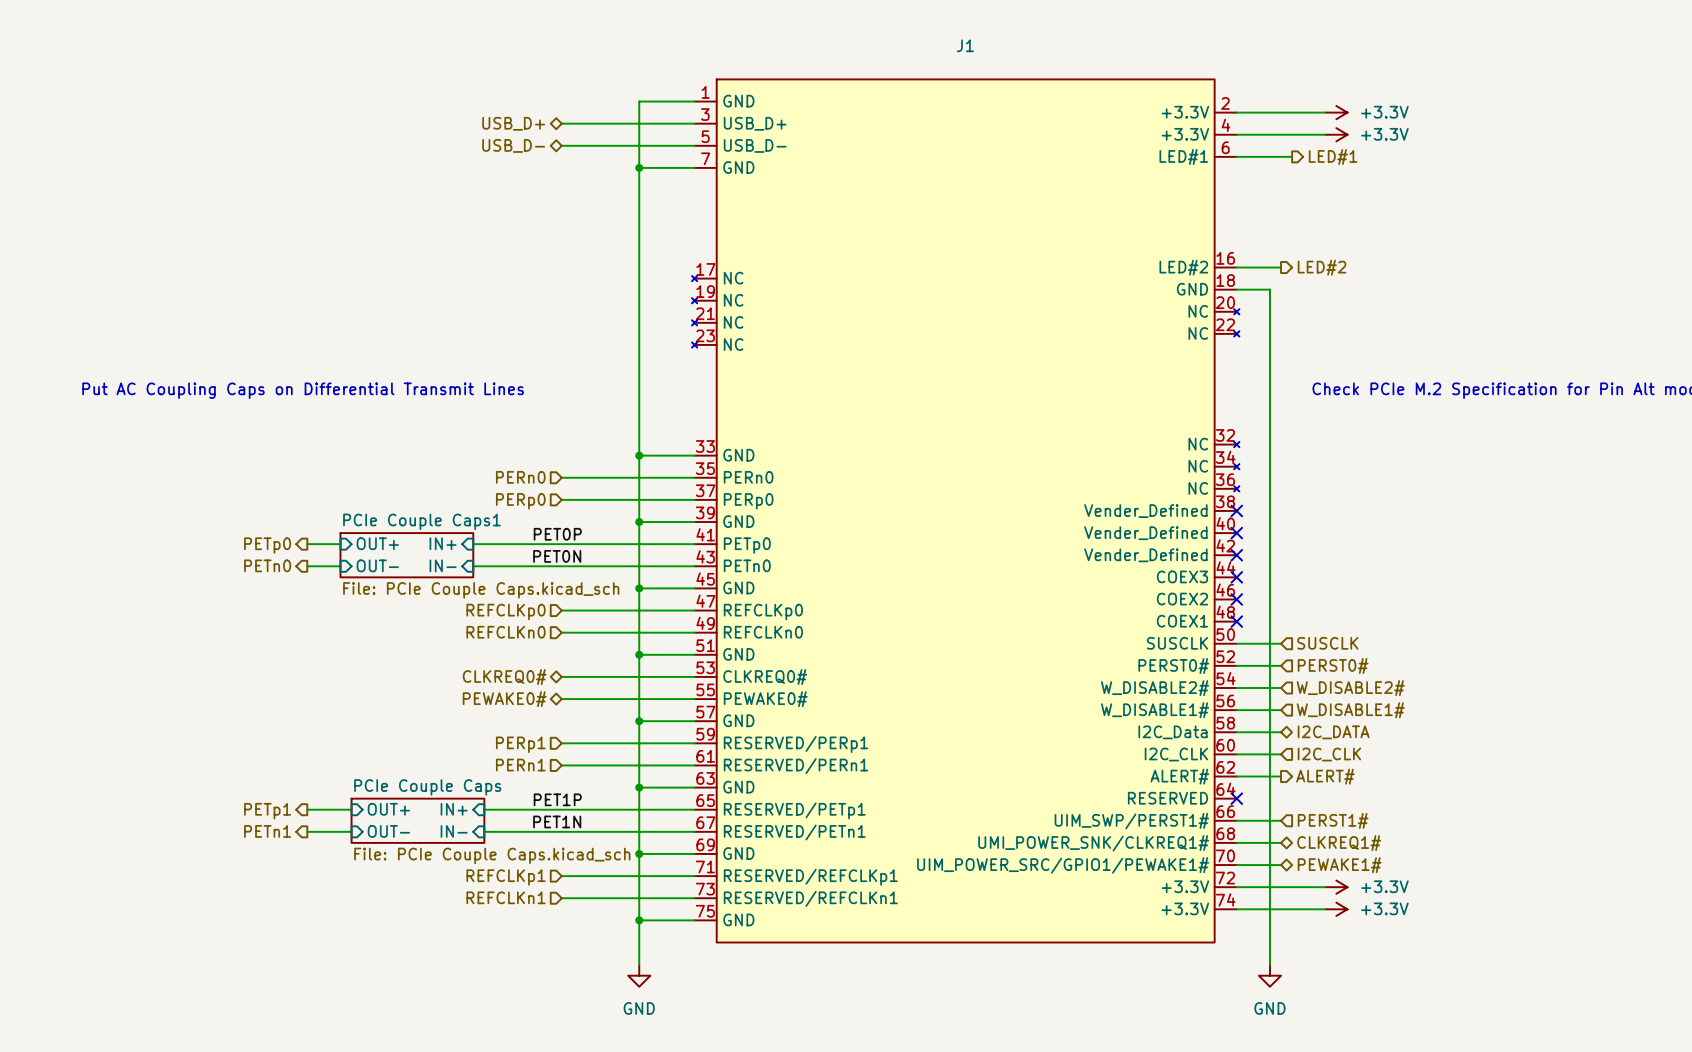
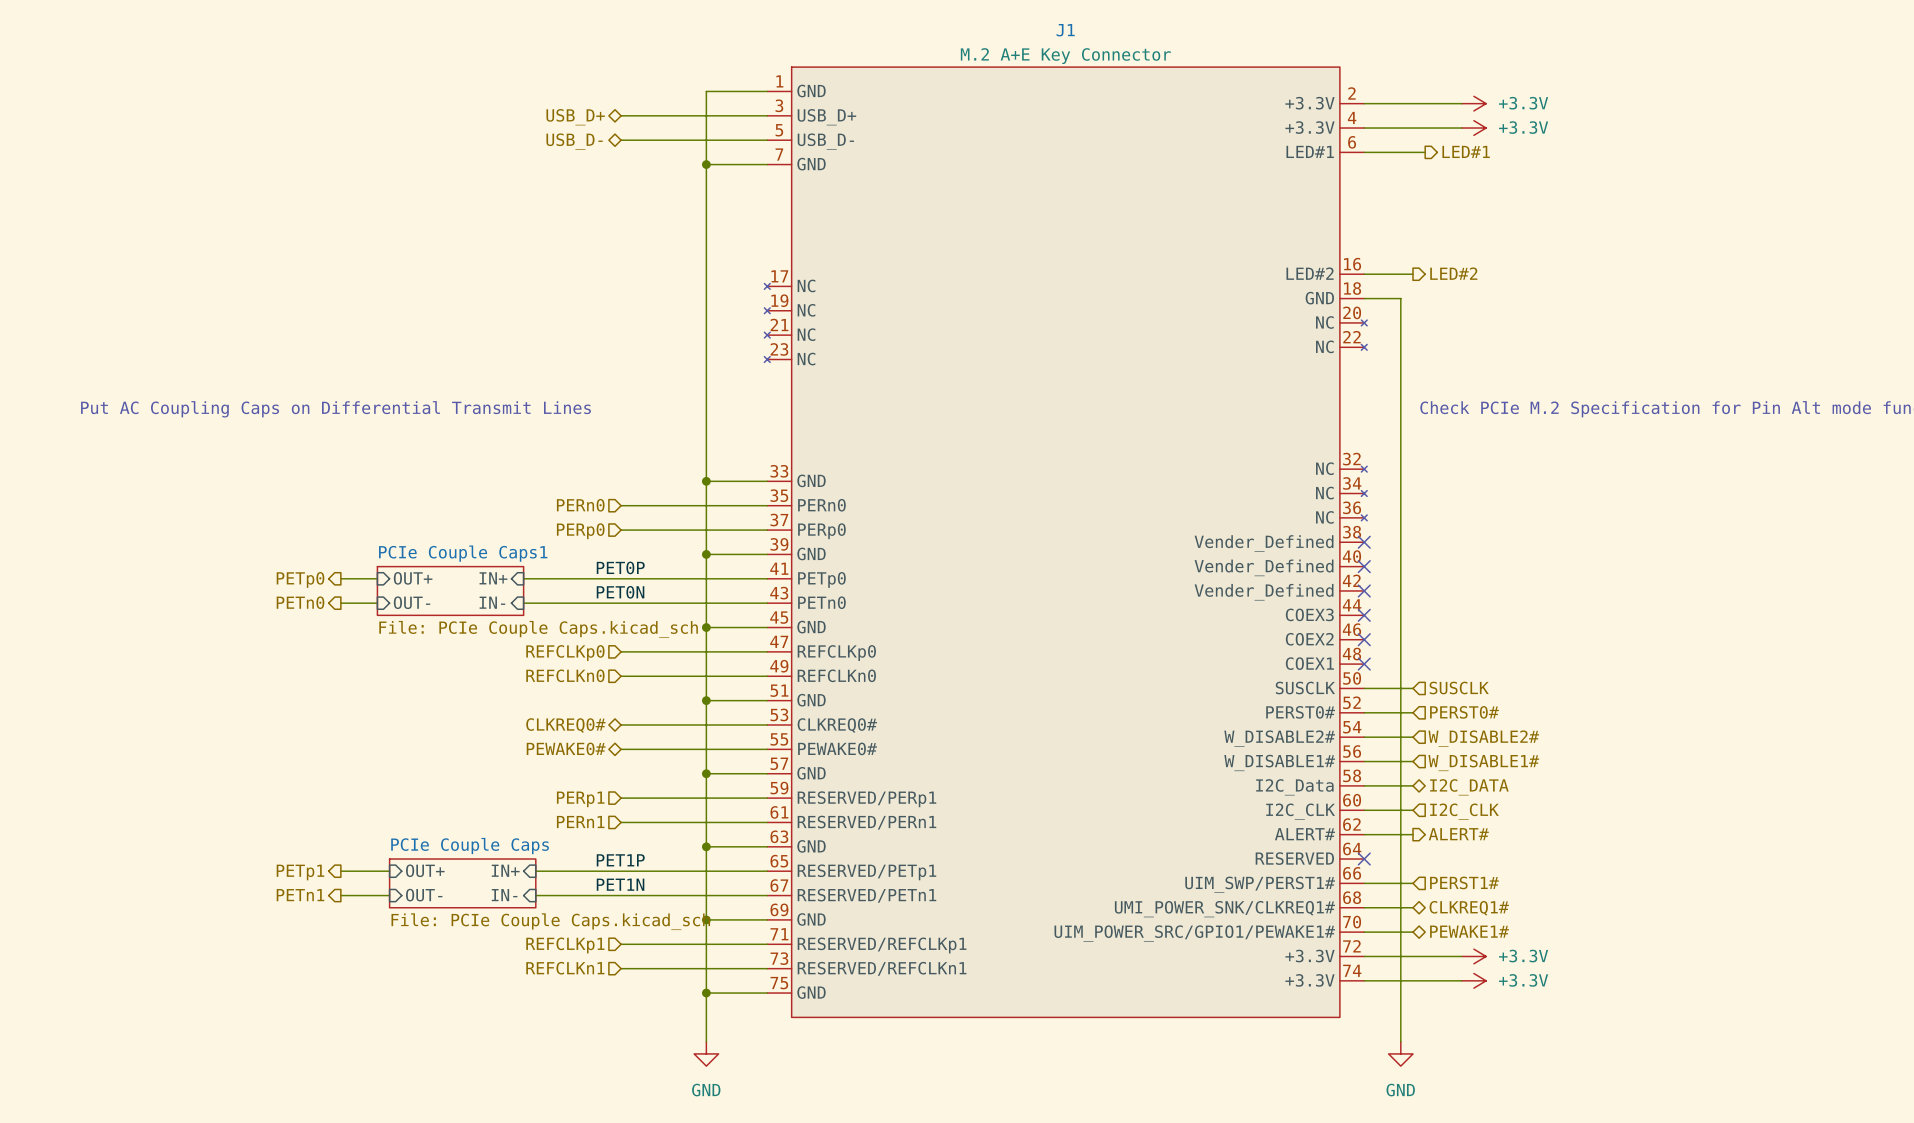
J1 value: none -> M.2 A+E Key Connector (1065, 56)

